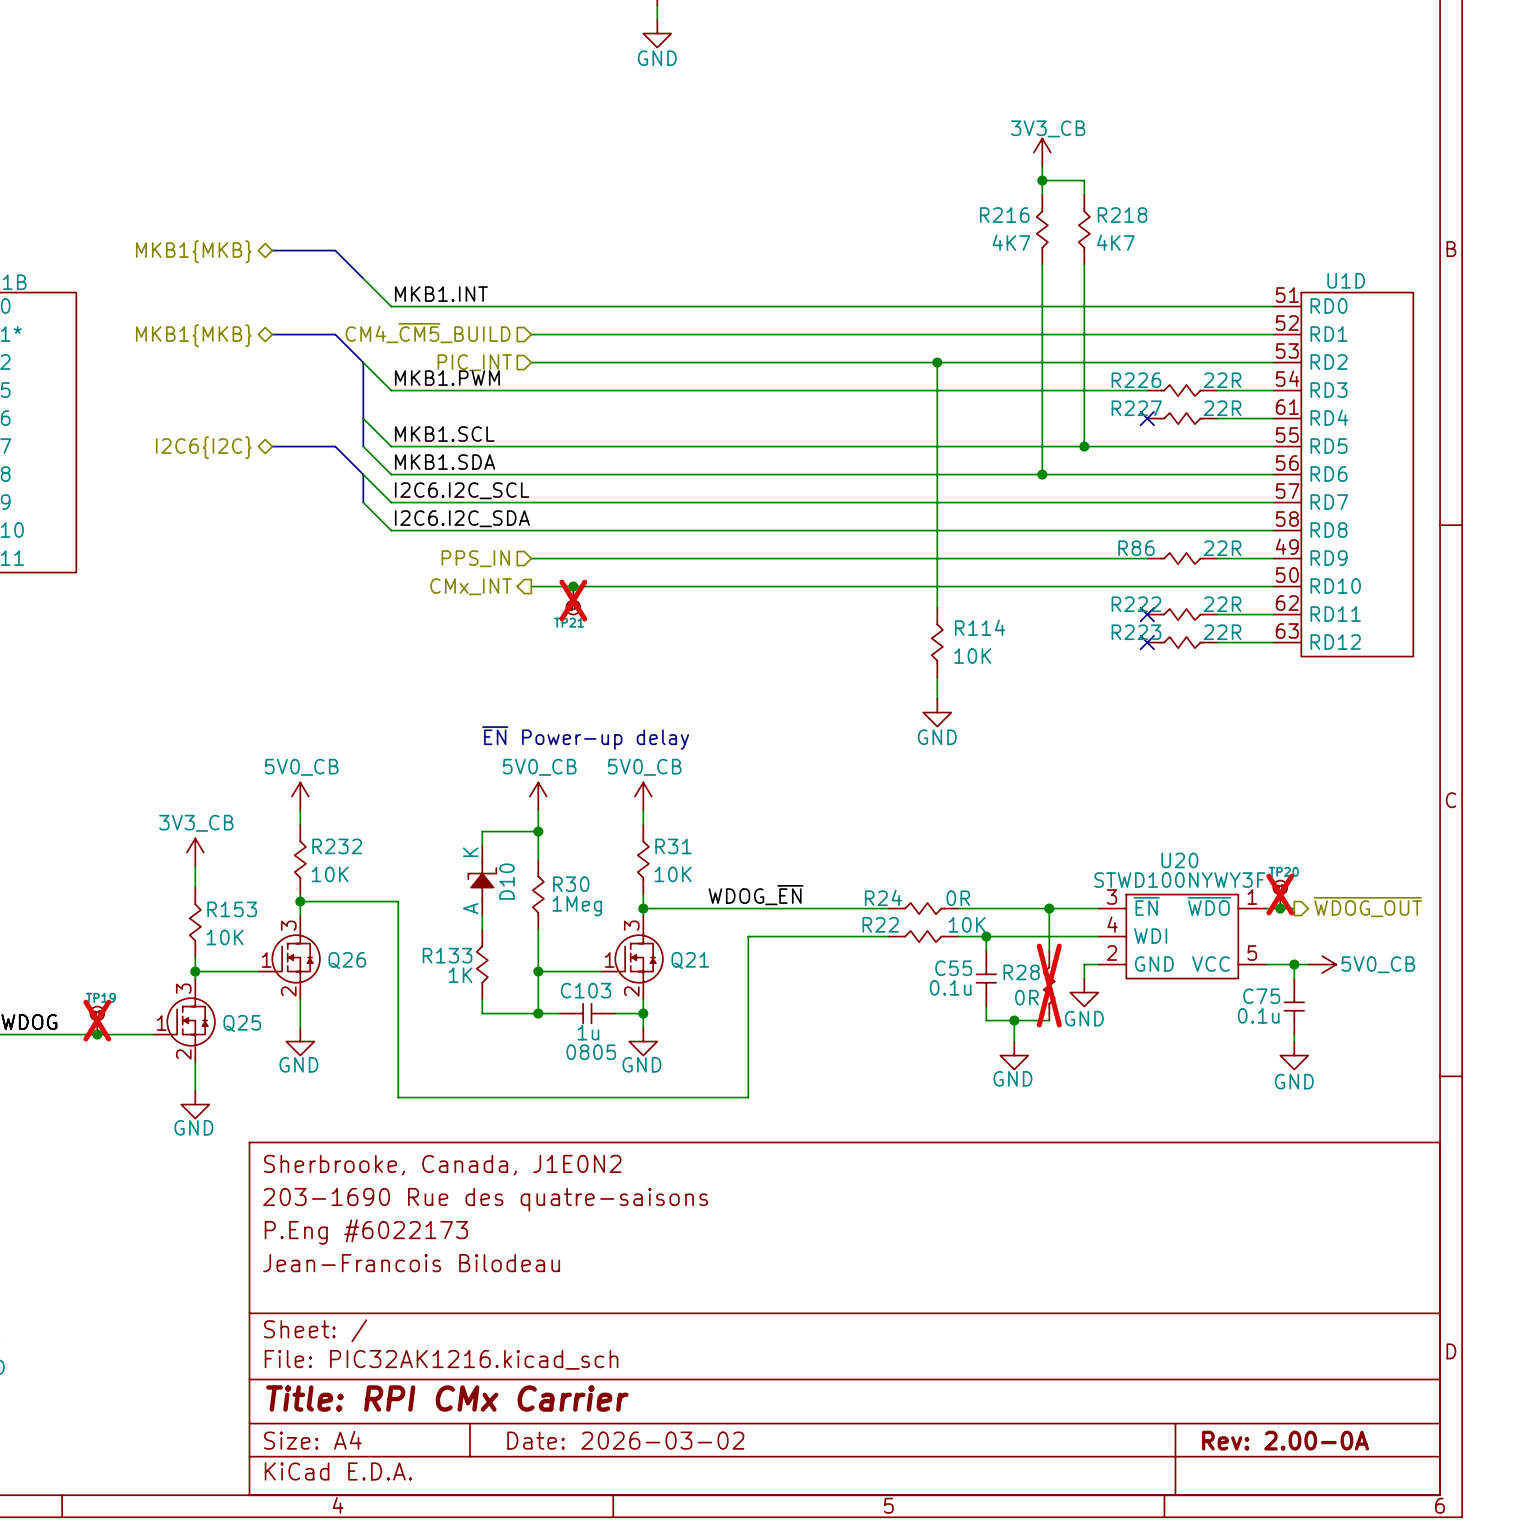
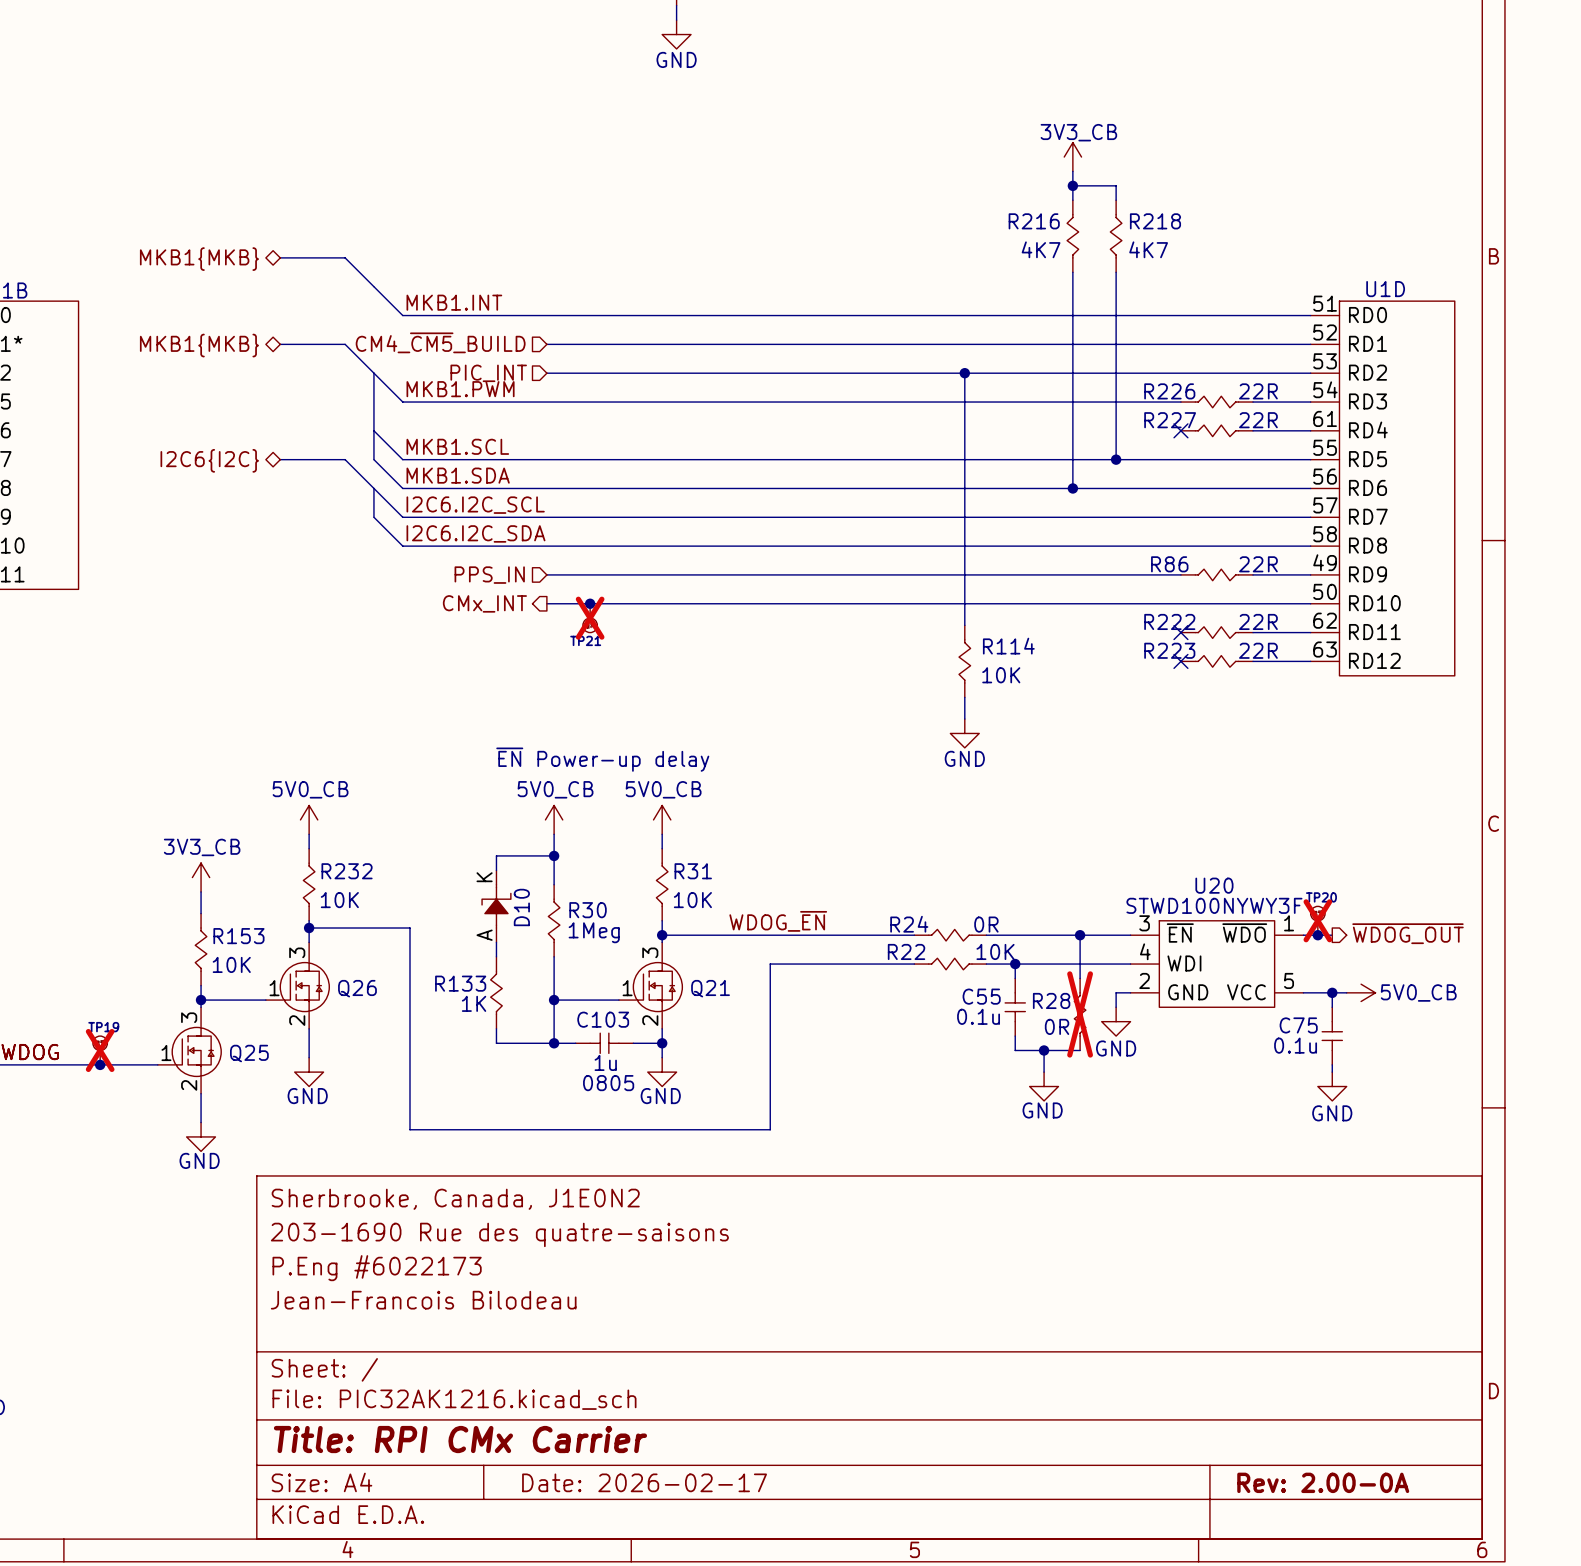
title block: Date: 2026-03-02 (625, 1440) -> Date: 2026-02-17 (644, 1482)

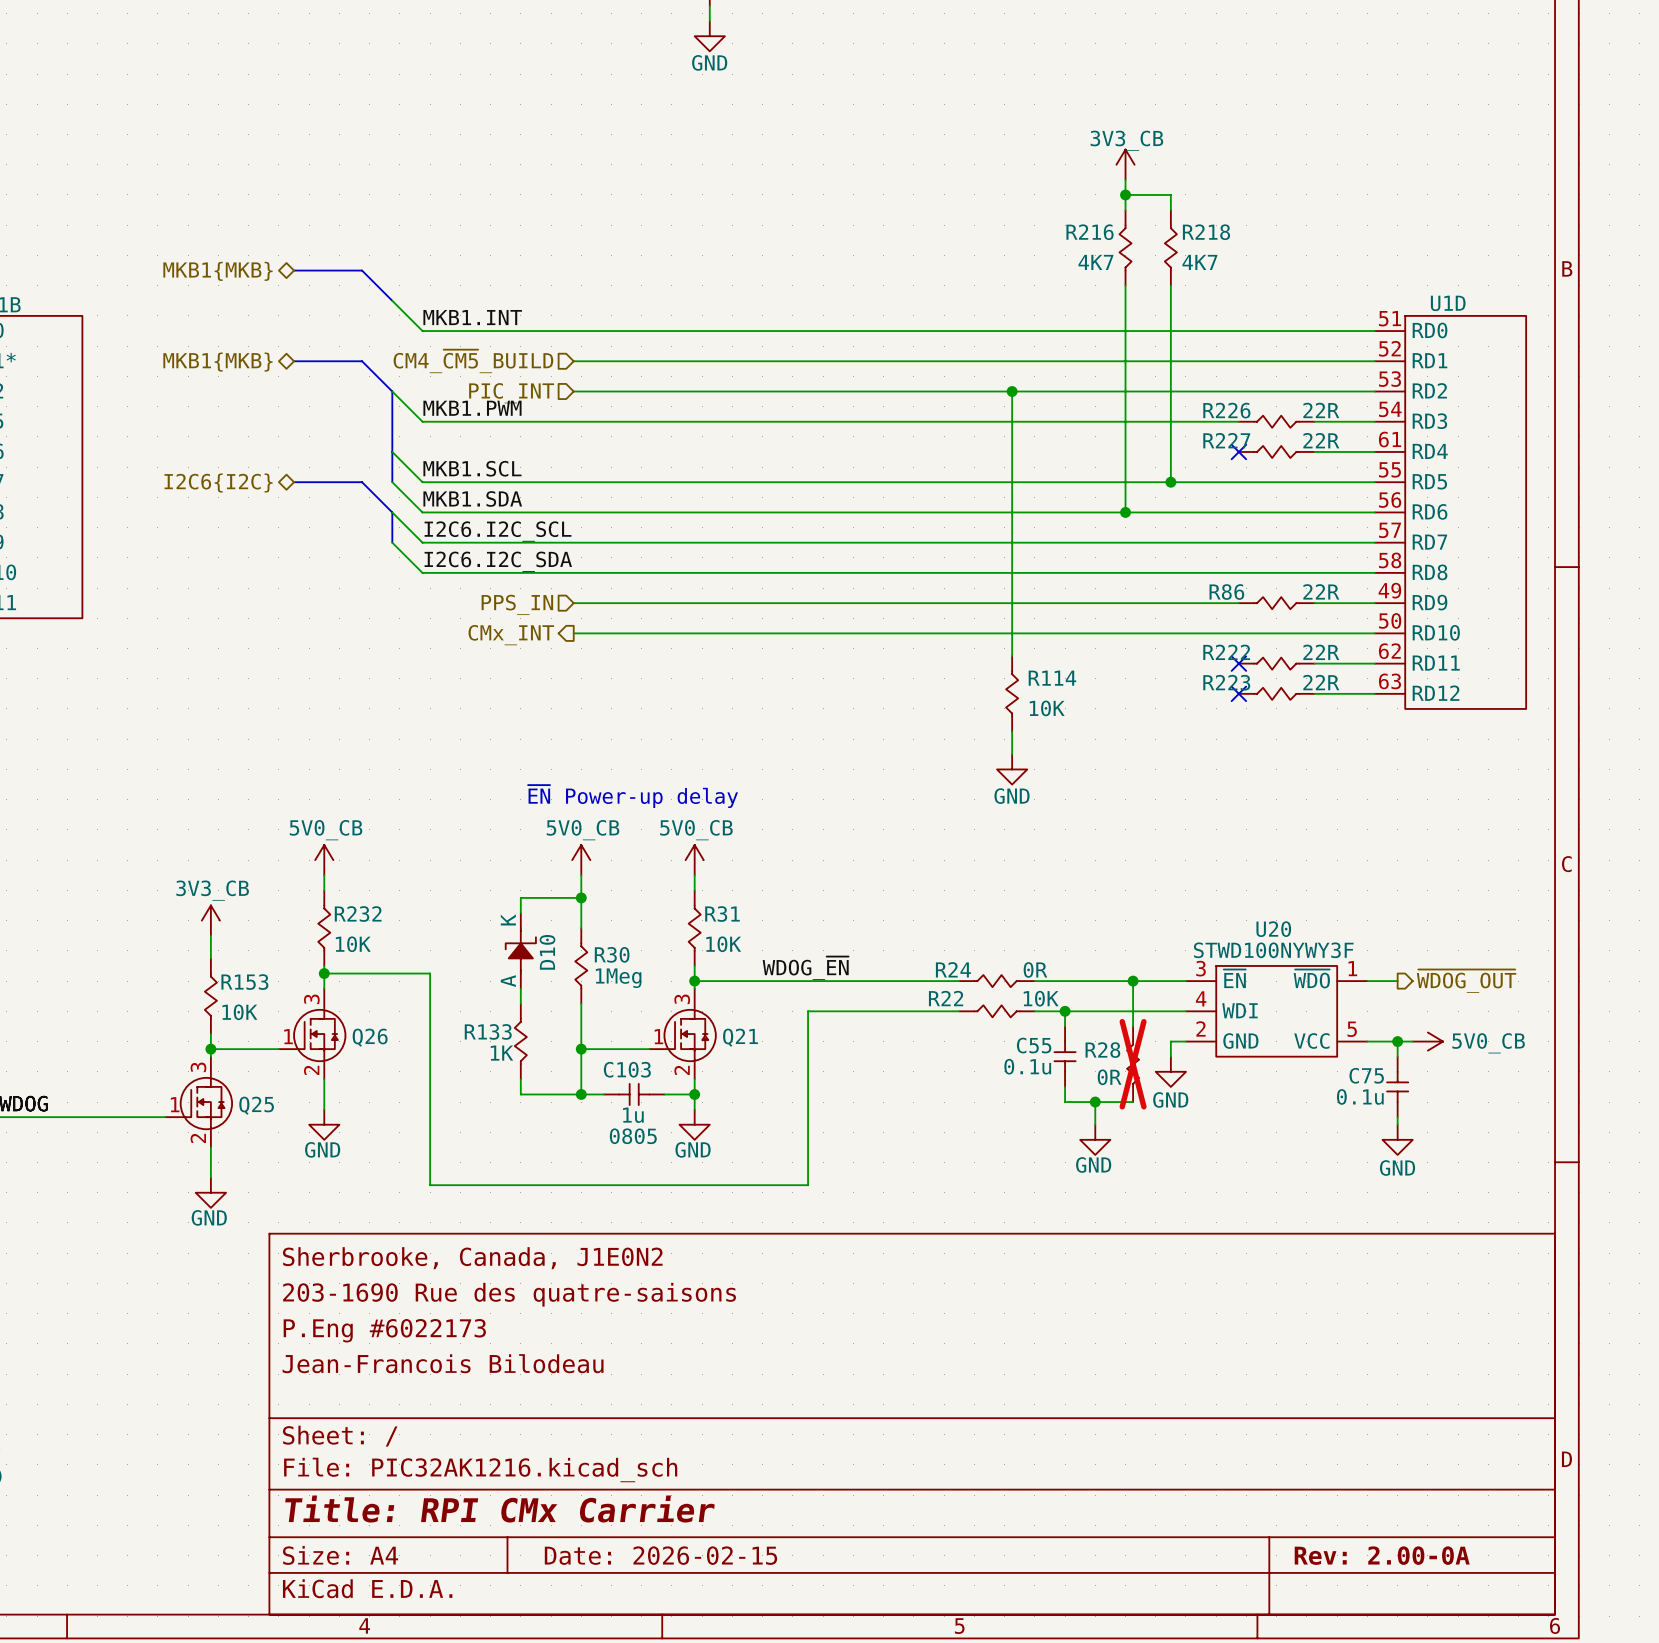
junction: (590, 603) -> none
TP21: (590, 618) -> none
TP20: (1317, 920) -> none
junction: (1317, 935) -> none
TP19: (100, 1050) -> none
junction: (100, 1064) -> none
title block: Date: 2026-02-17 (644, 1482) -> Date: 2026-02-15 (660, 1555)

